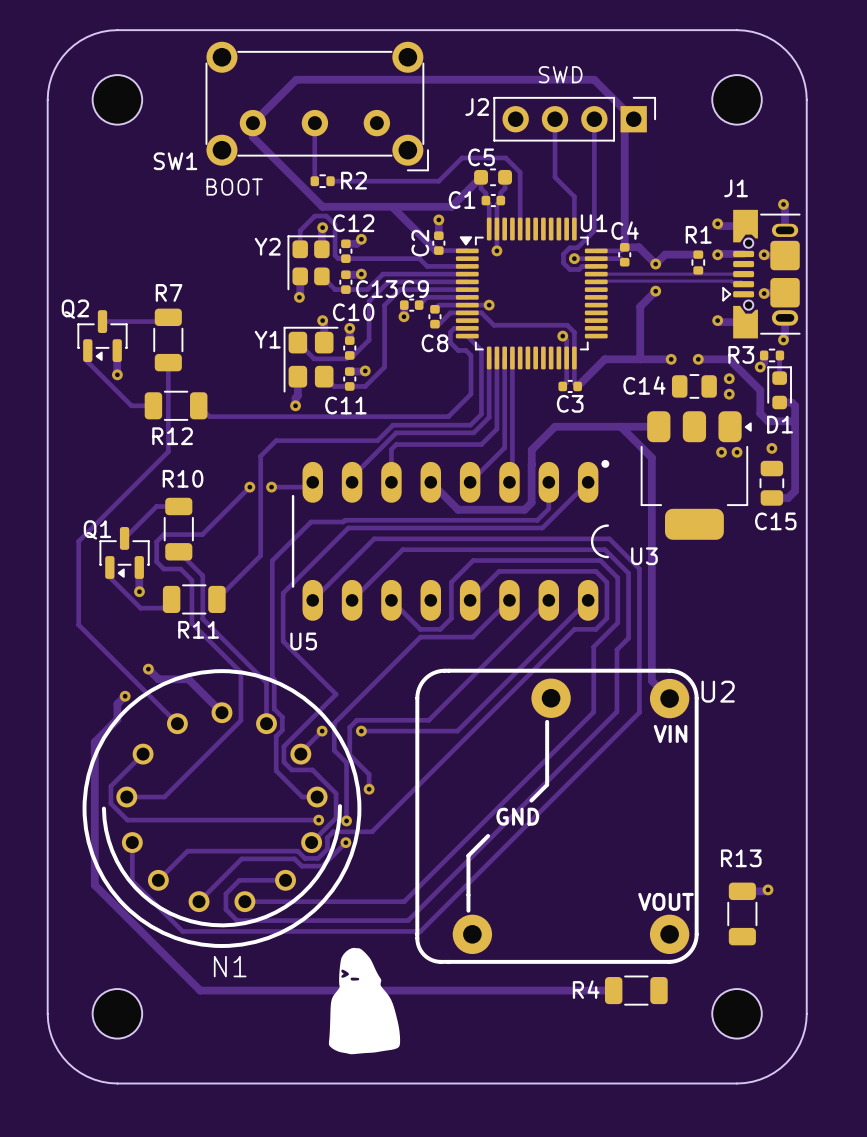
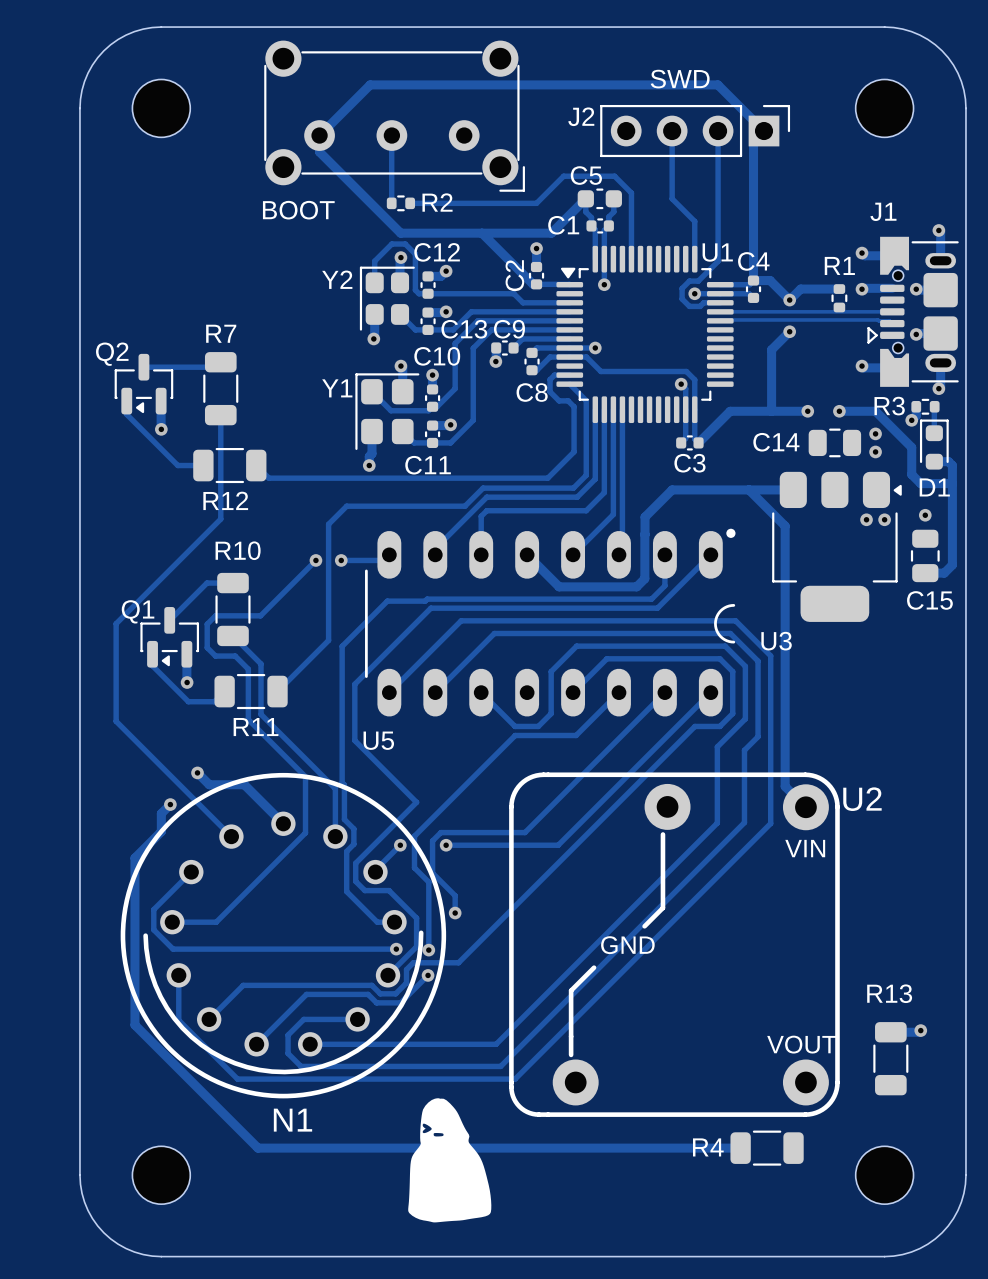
SW1 name: SW1 (175, 161) -> none

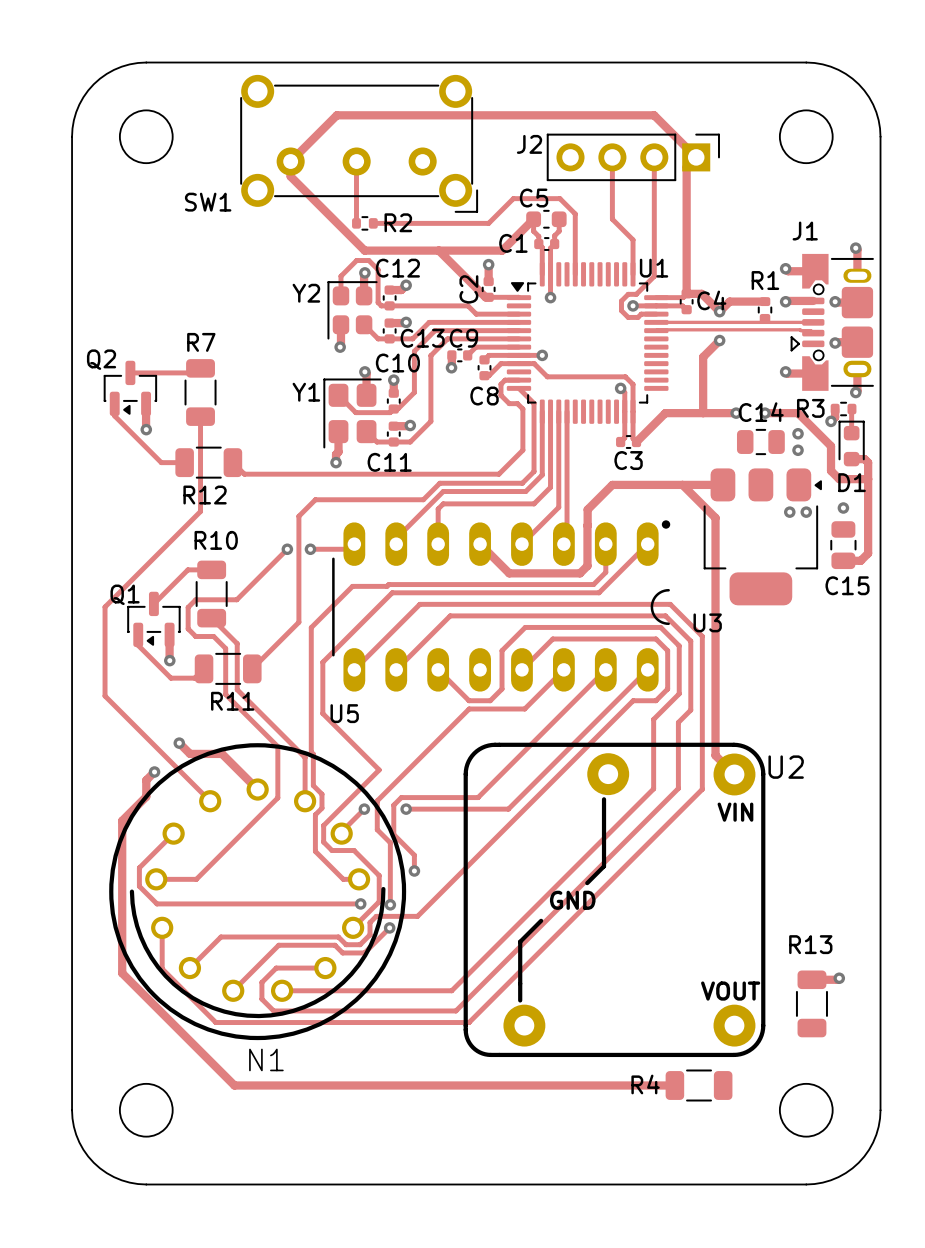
text: SWD (680, 79) -> none
SW1 name: none -> SW1 (208, 202)
text: BOOT (298, 210) -> none
C4 name position: C4 (753, 261) -> C4 (711, 300)
C14 name position: C14 (776, 442) -> C14 (761, 412)
drawing: [408, 1098, 492, 1223] -> none

